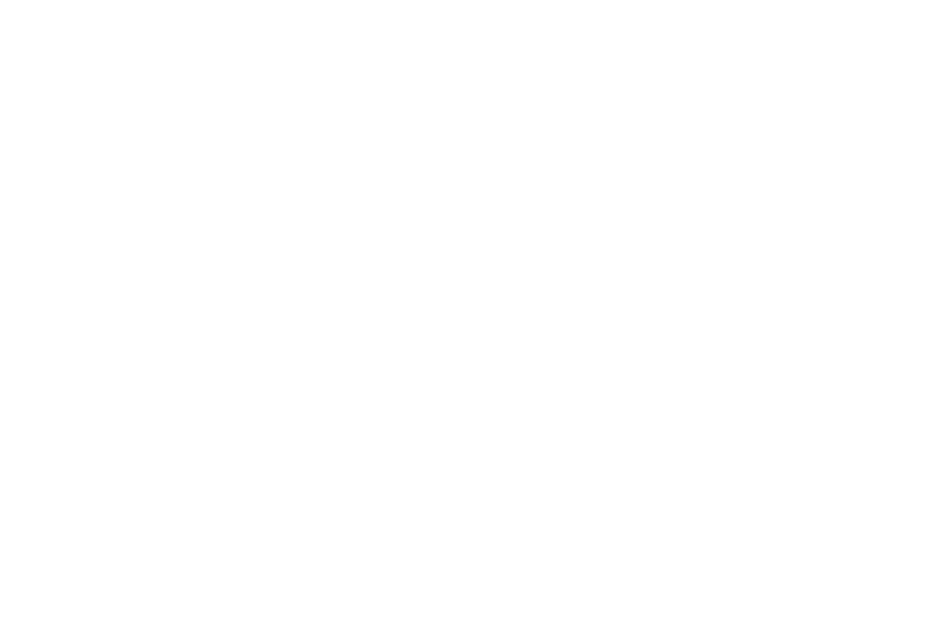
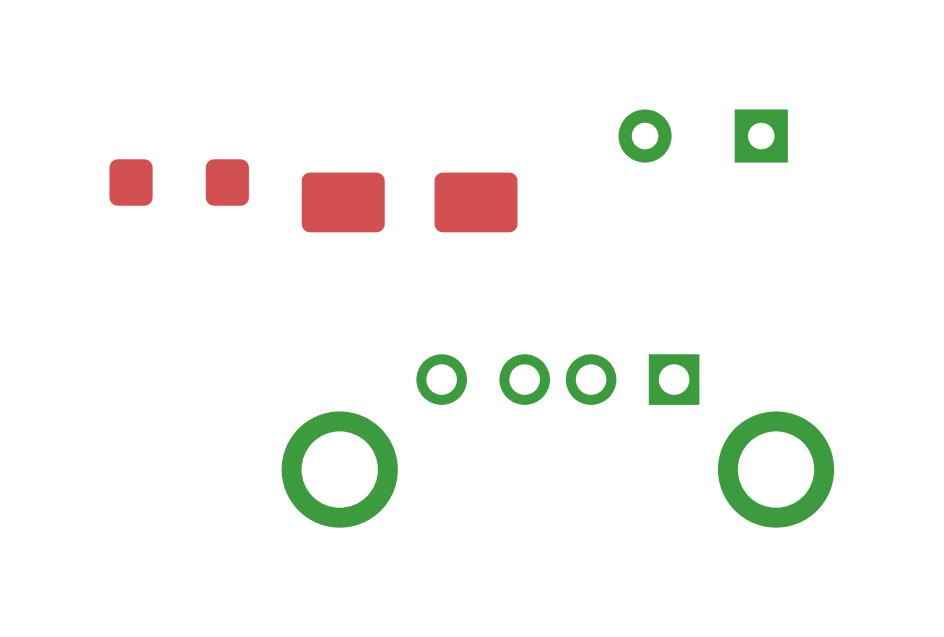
part: none -> (703, 136)
part: none -> (179, 182)
part: none -> (409, 202)
part: none -> (557, 440)

